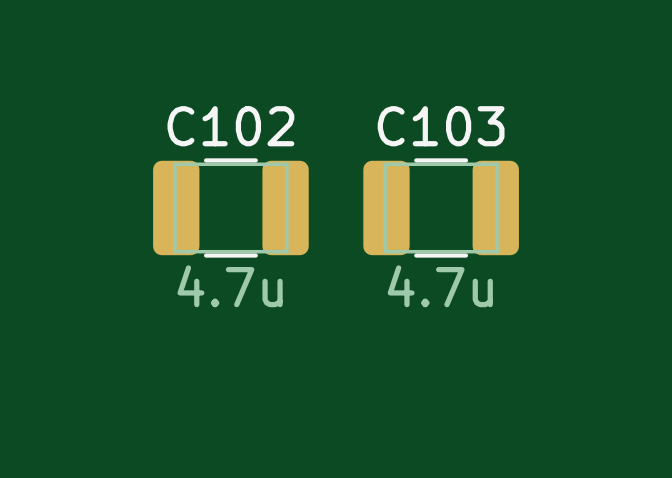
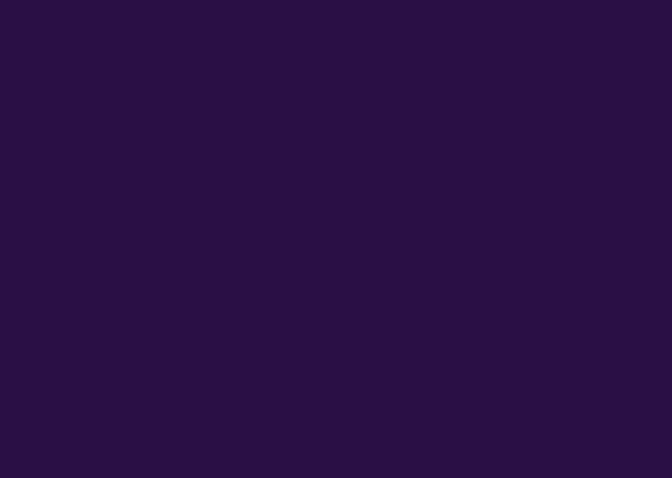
C102: 4.7u (230, 207) -> none
C103: 4.7u (441, 207) -> none

